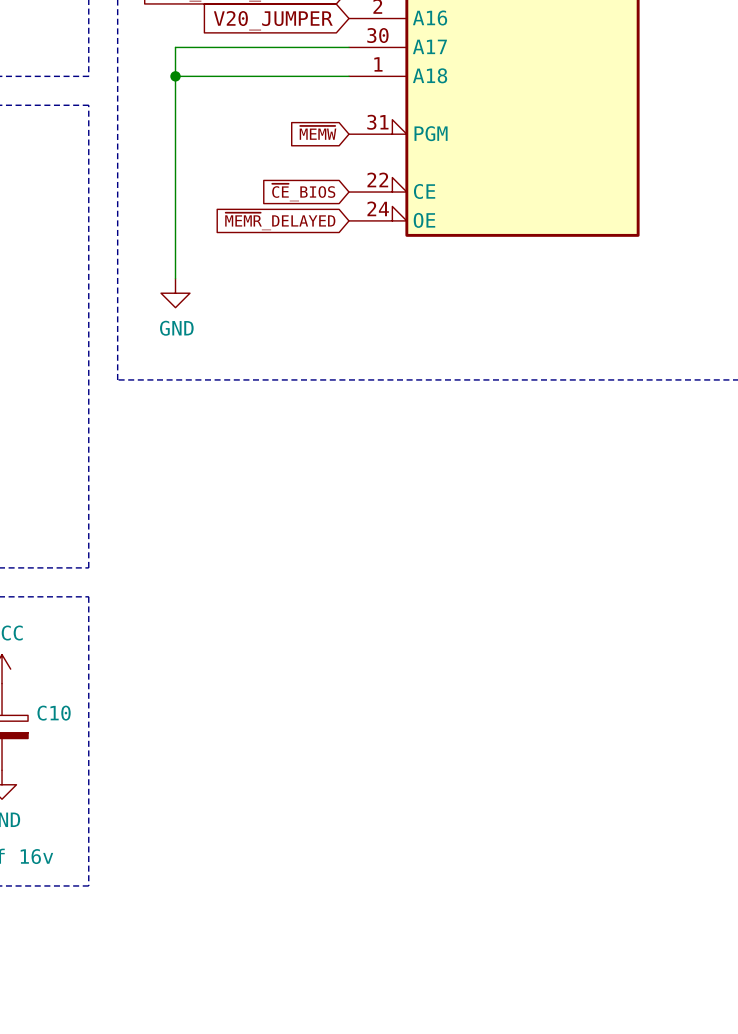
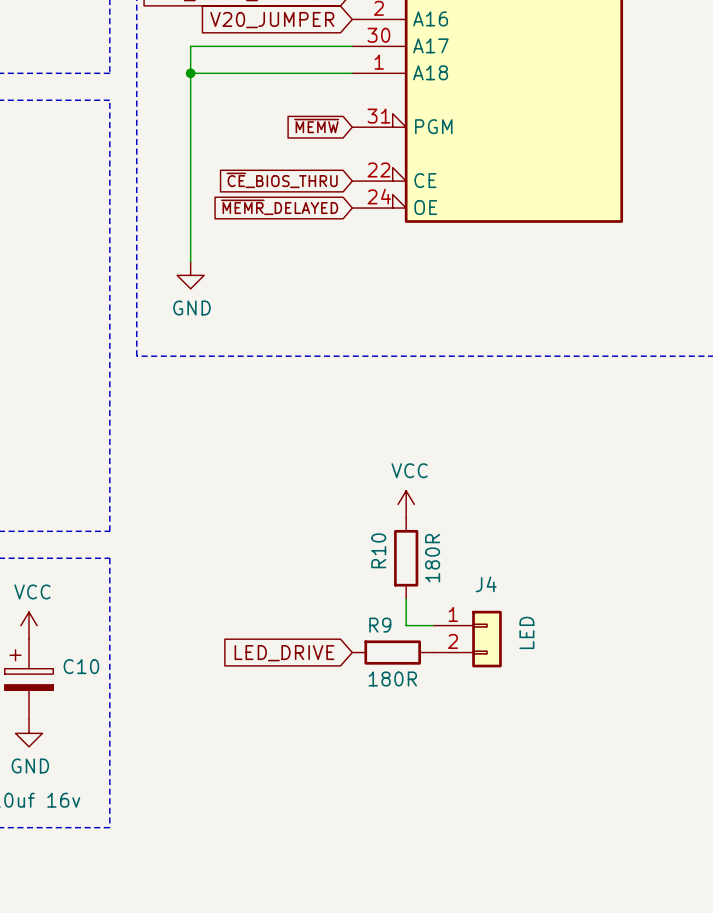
global label: ~{CE}_BIOS (303, 192) -> ~{CE}_BIOS_THRU (282, 180)
power symbol: none -> VCC (406, 504)
R10: none -> 180R (406, 558)
wire: none -> (406, 598) (406, 625) (433, 625)
J4: none -> LED (467, 639)
R9: none -> 180R (392, 652)
global label: none -> LED_DRIVE (284, 653)

